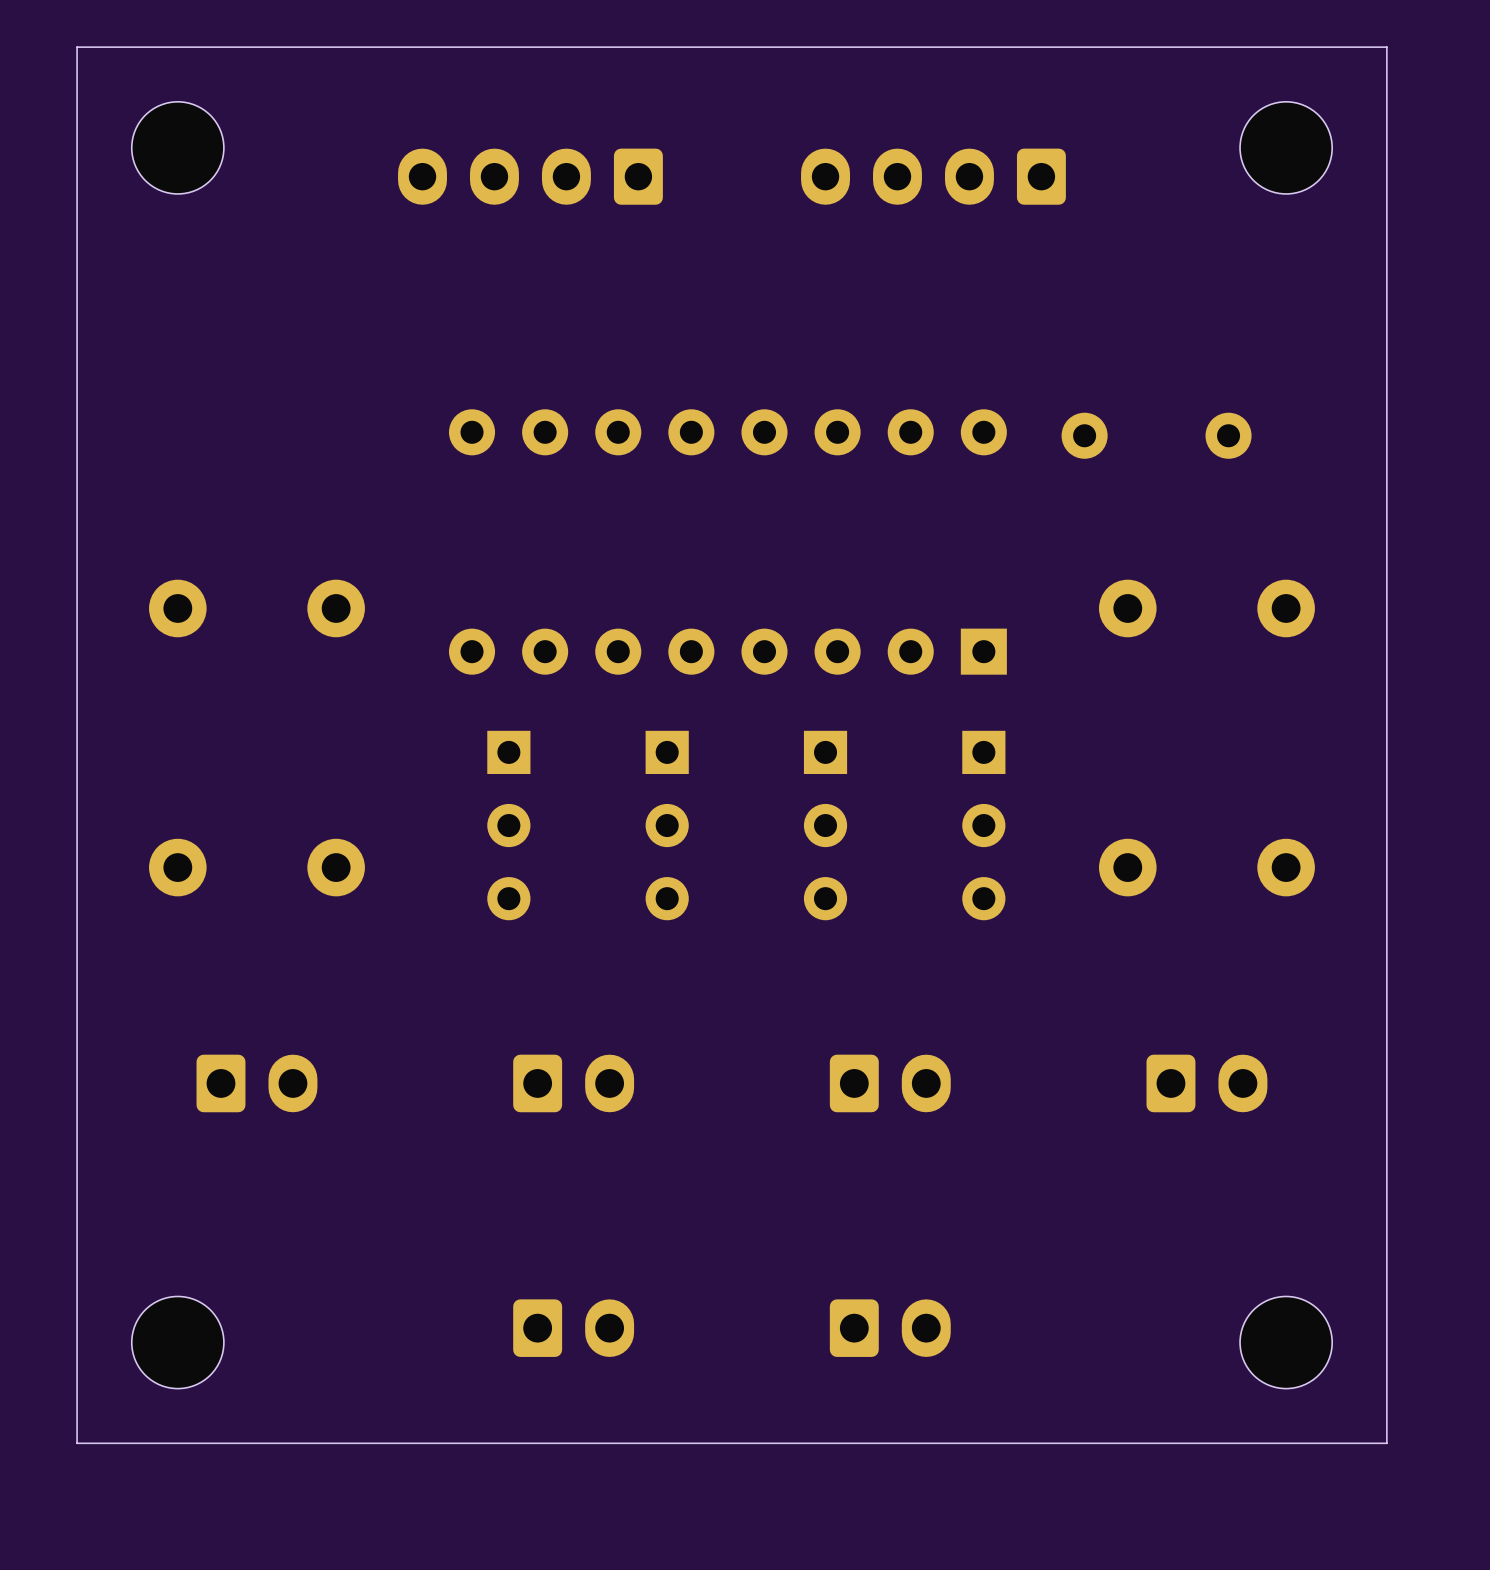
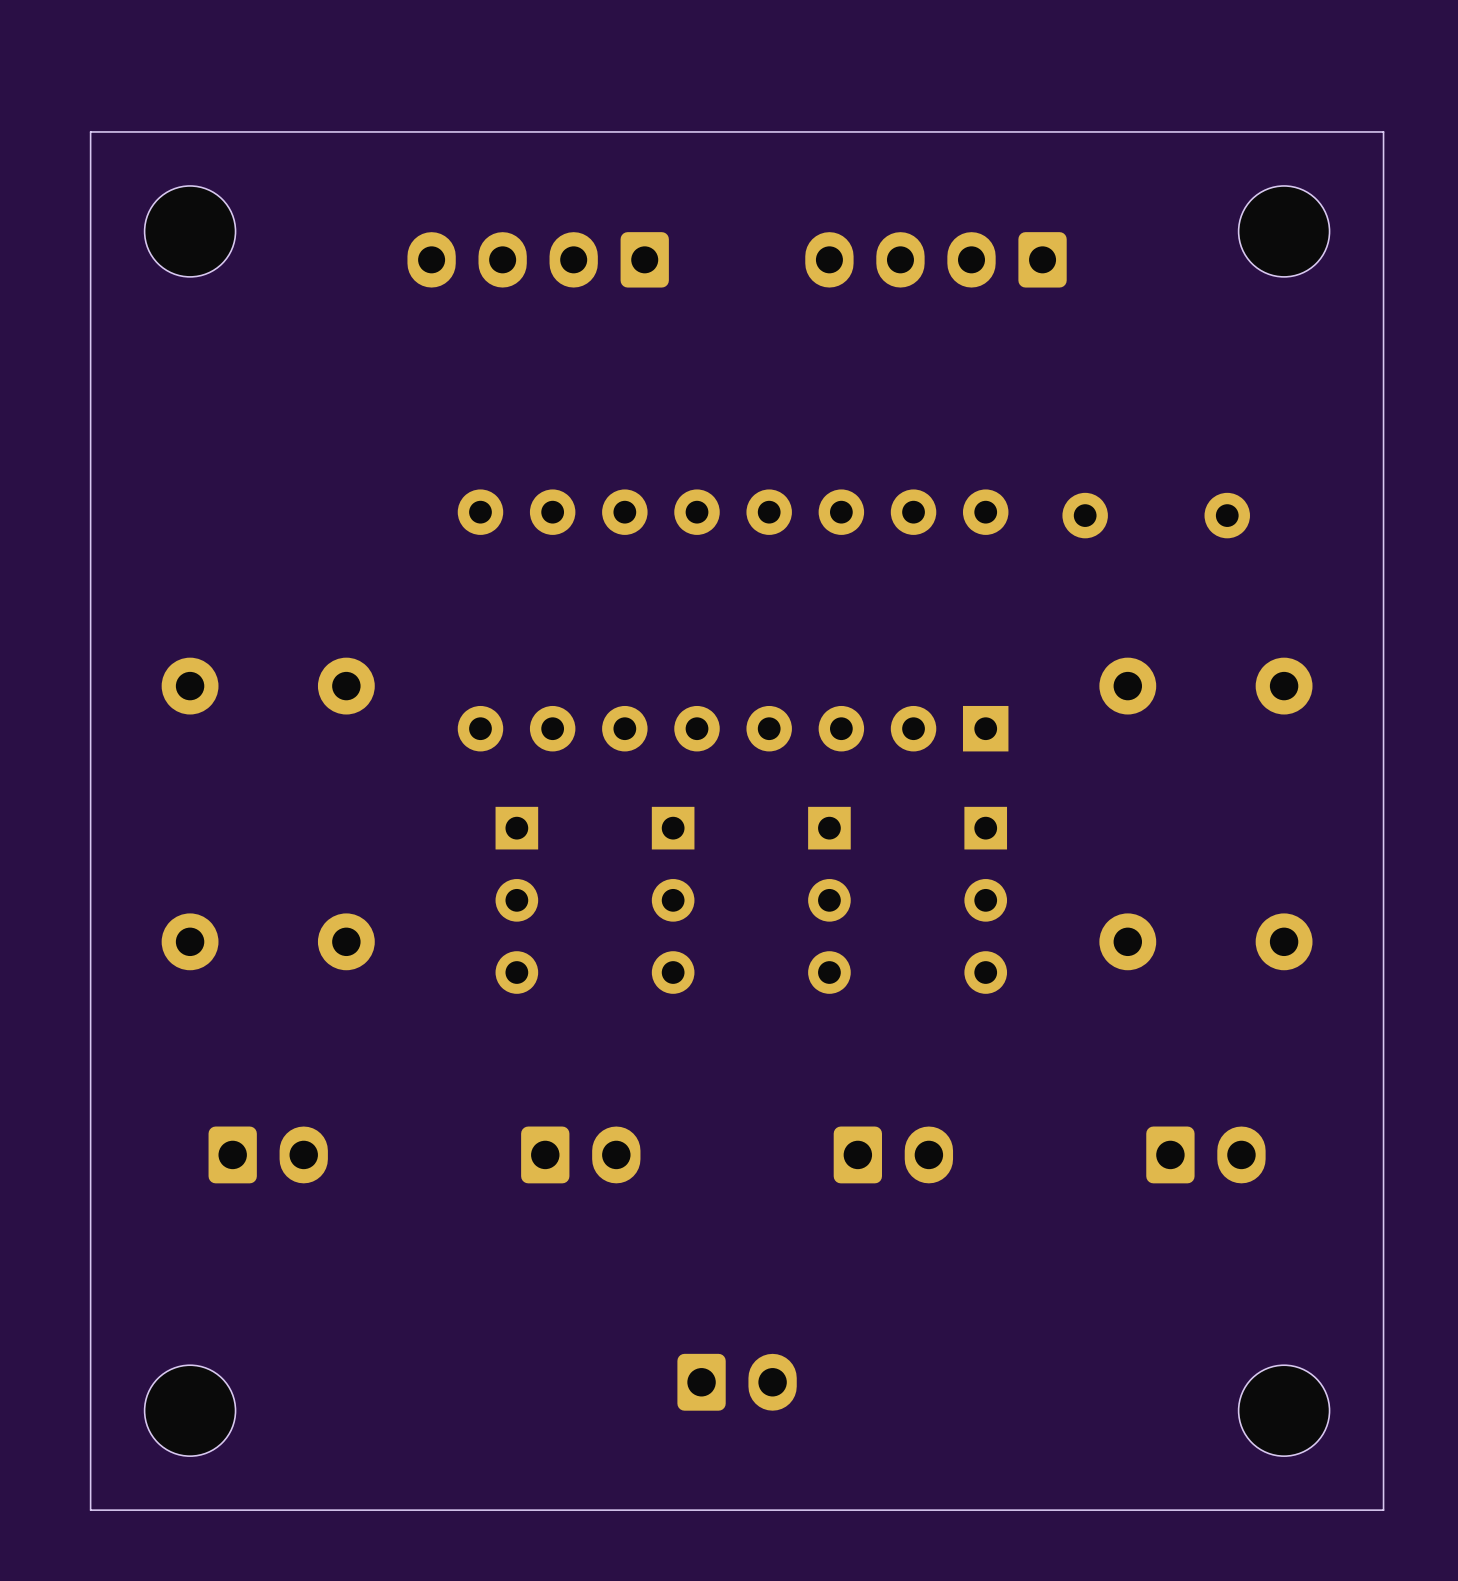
part: none -> (737, 1382)
part: (573, 1328) -> none
part: (890, 1328) -> none

